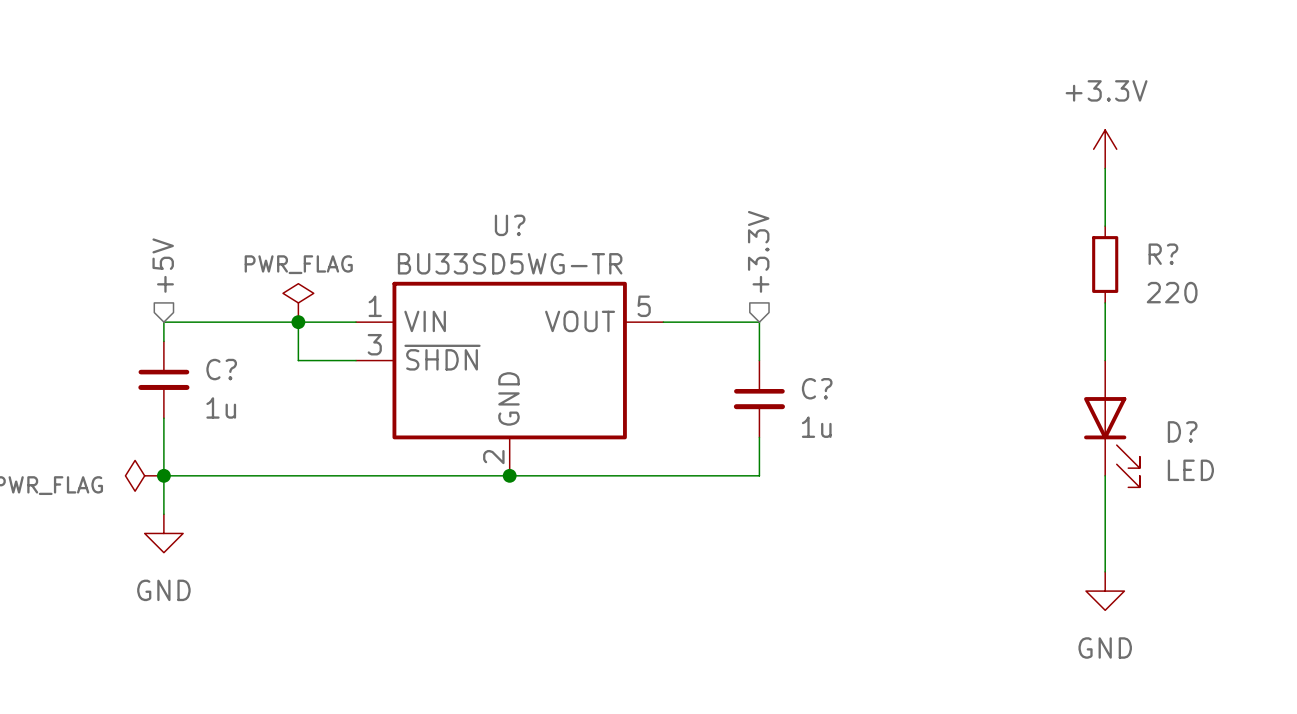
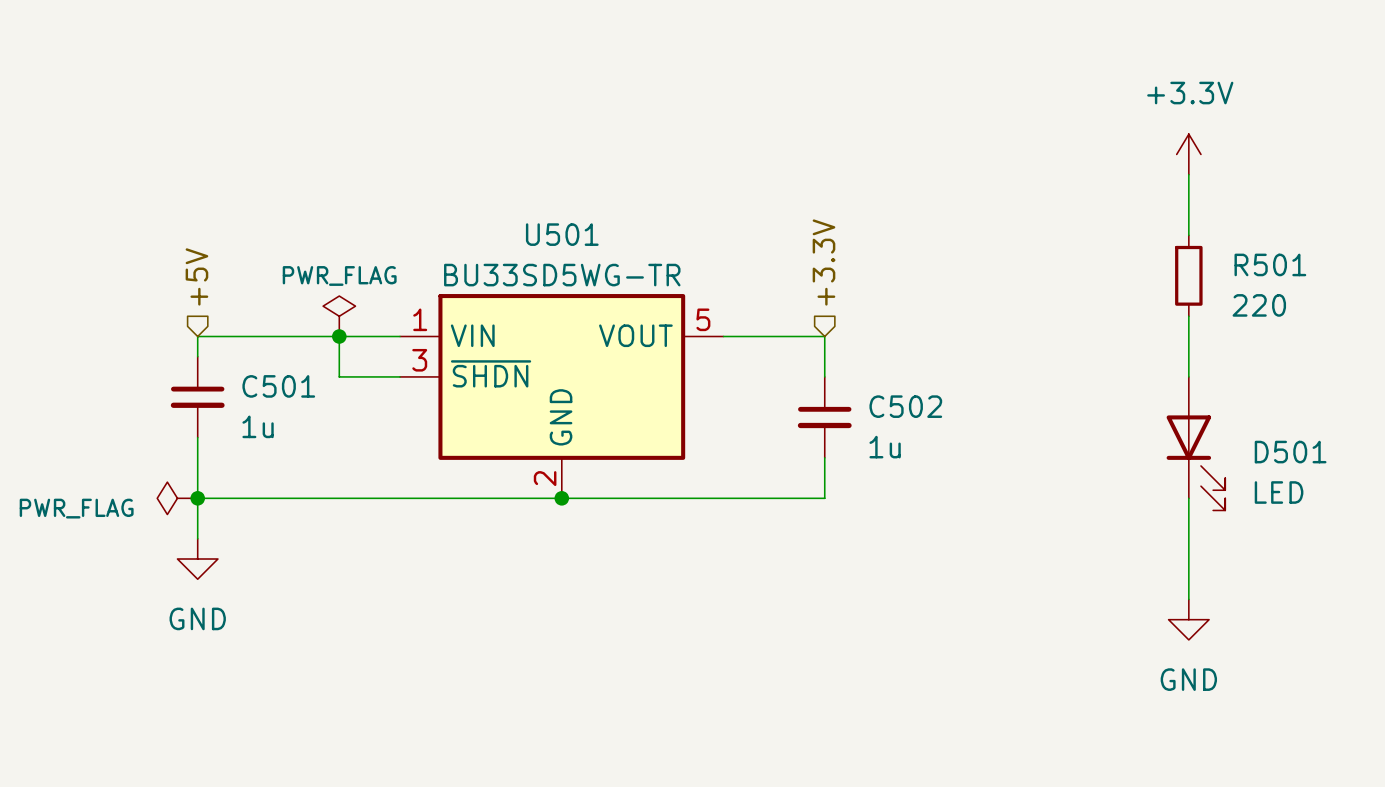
U? name: U? (510, 225) -> U501 (562, 234)
R? name: R? (1163, 254) -> R501 (1270, 264)
C? name: C? (221, 369) -> C501 (278, 386)
C? name: C? (817, 388) -> C502 (905, 406)
D? name: D? (1182, 431) -> D501 (1290, 452)

